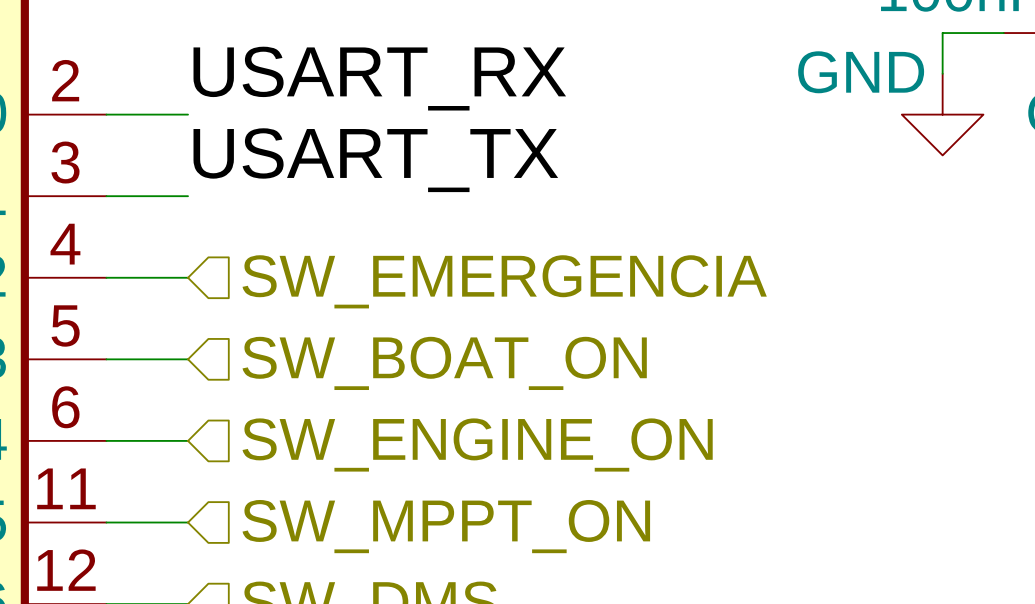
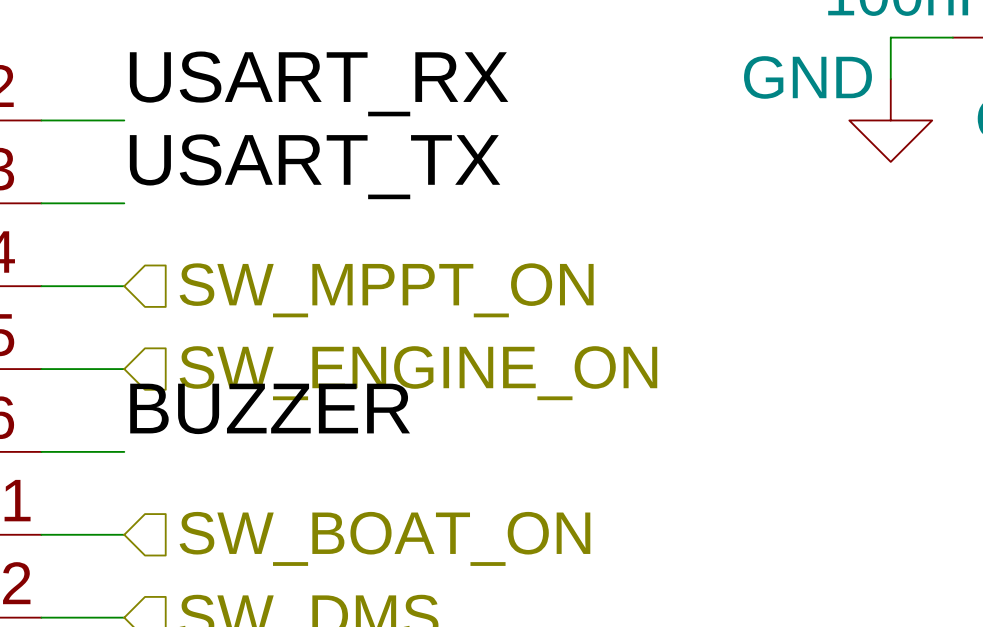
hierarchical label: SW_EMERGENCIA (504, 281) -> SW_MPPT_ON (386, 290)
hierarchical label: SW_BOAT_ON (444, 363) -> SW_ENGINE_ON (418, 373)
label: none -> BUZZER (270, 408)
hierarchical label: SW_ENGINE_ON (477, 444) -> none
hierarchical label: SW_MPPT_ON (446, 526) -> SW_BOAT_ON (384, 538)

